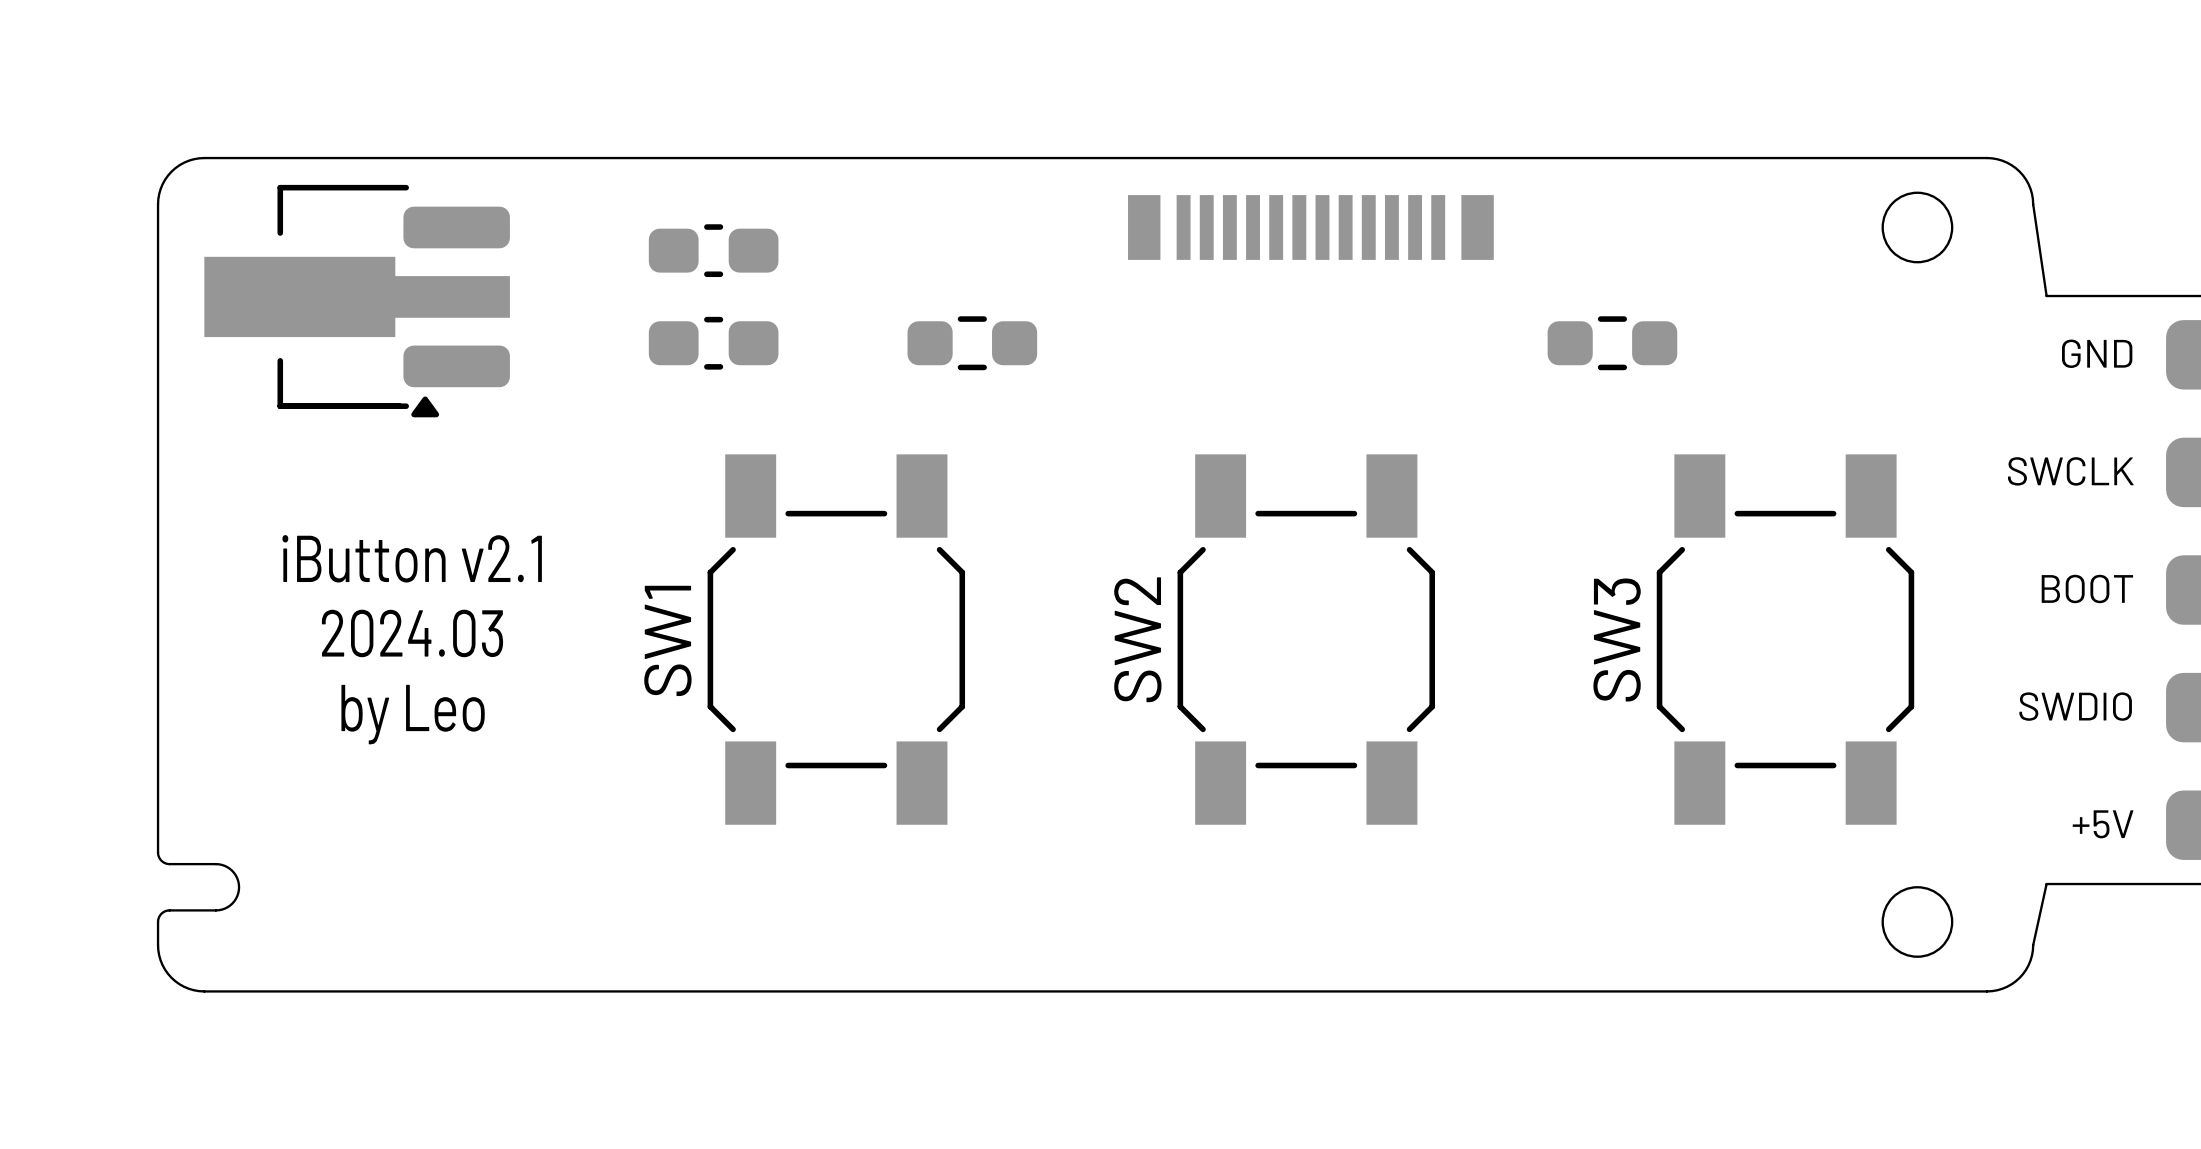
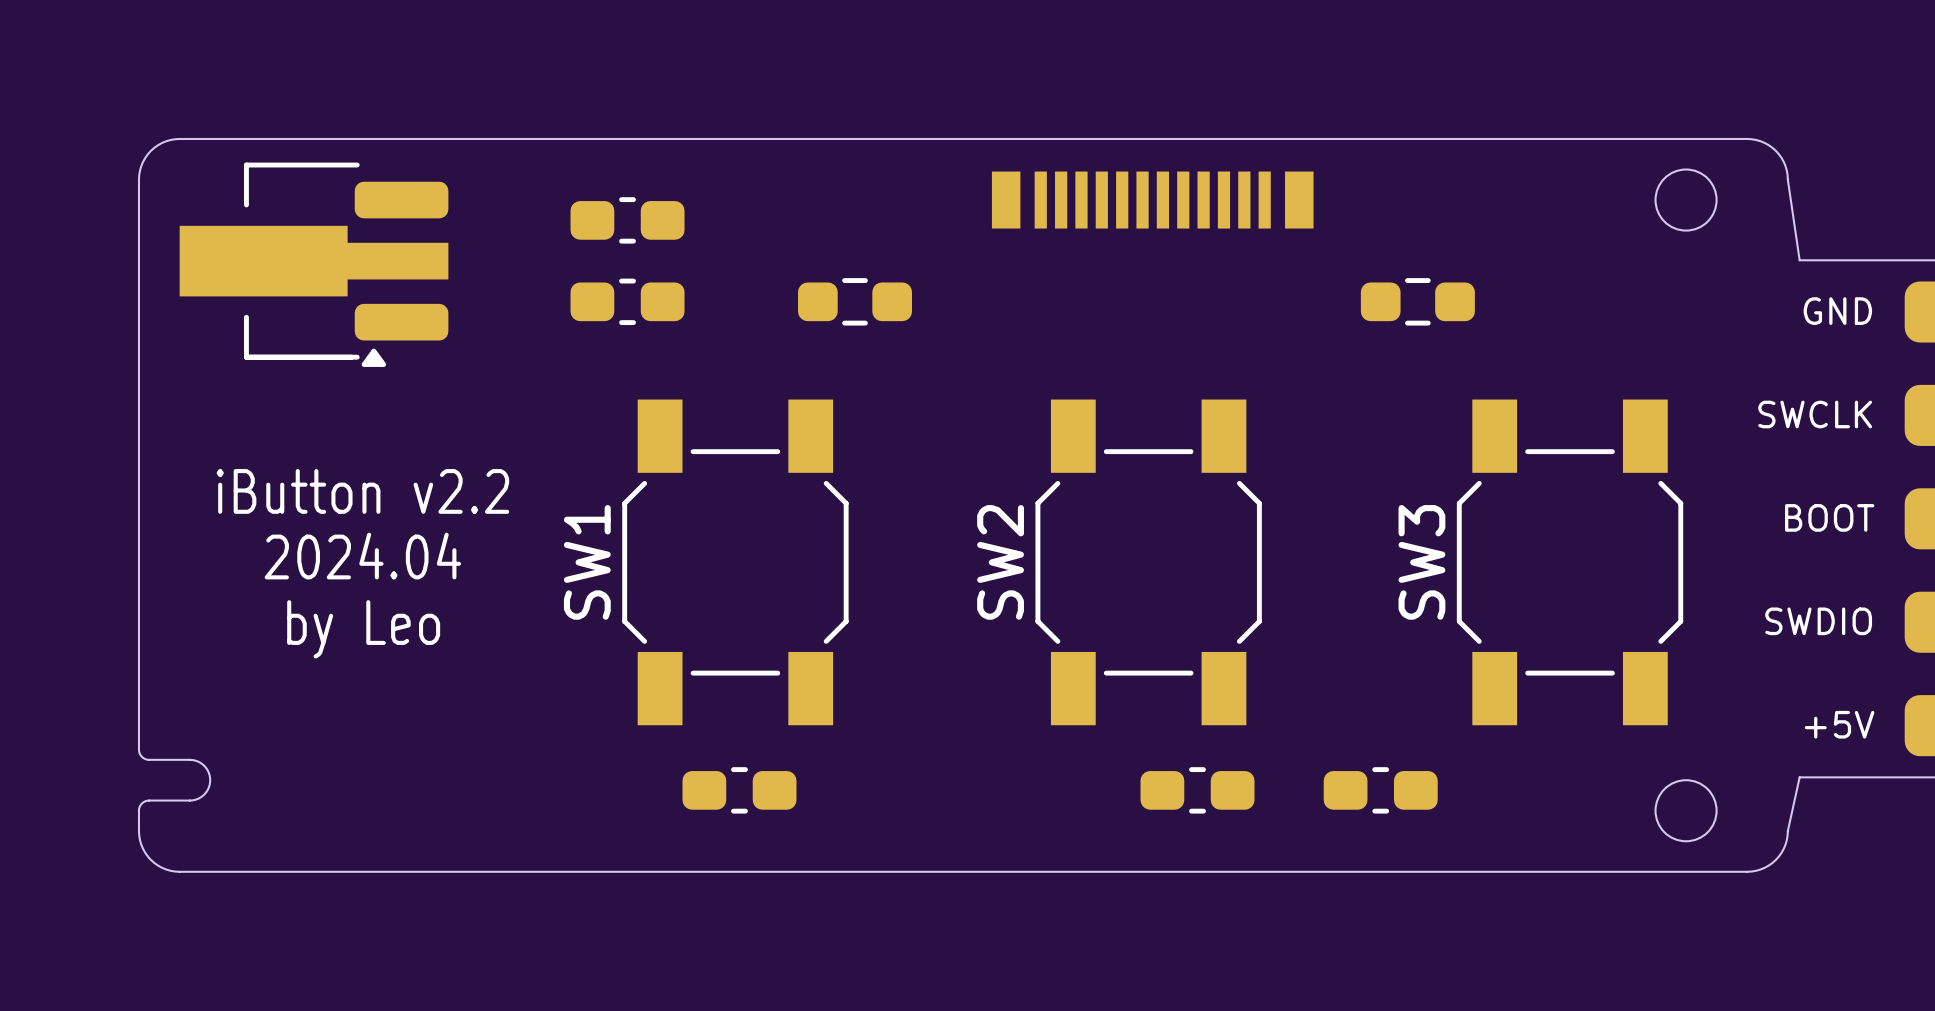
text: iButton v2.1 (412, 558) -> iButton v2.2 (362, 491)
text: 2024.03 (412, 633) -> 2024.04 (362, 556)
part: none -> (739, 790)
part: none -> (1197, 790)
part: none -> (1380, 790)

